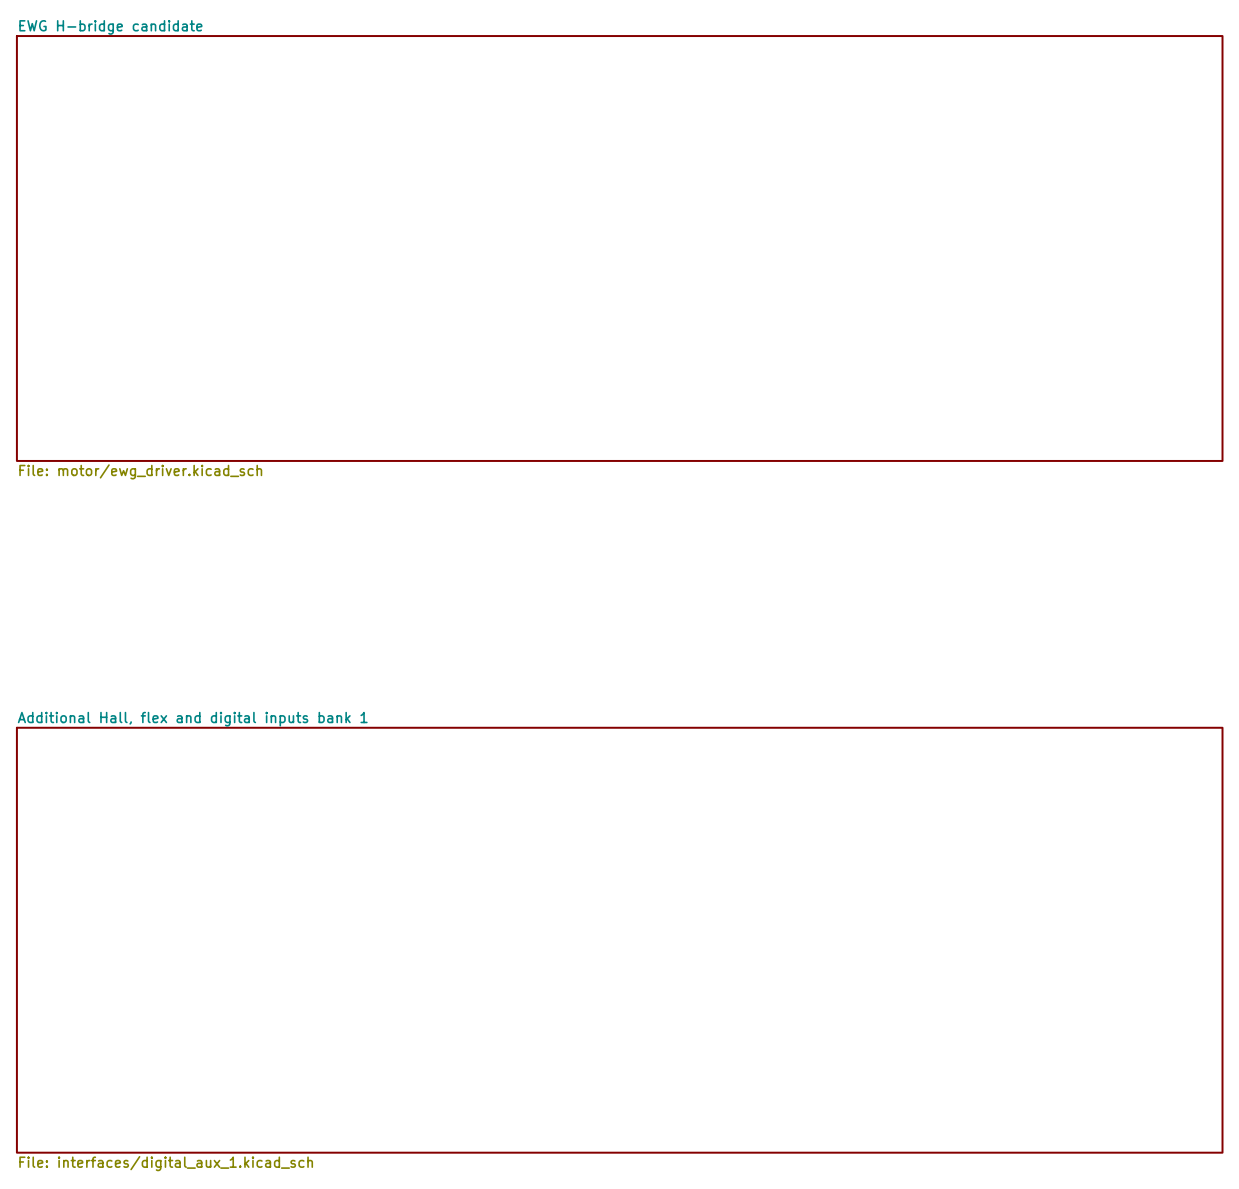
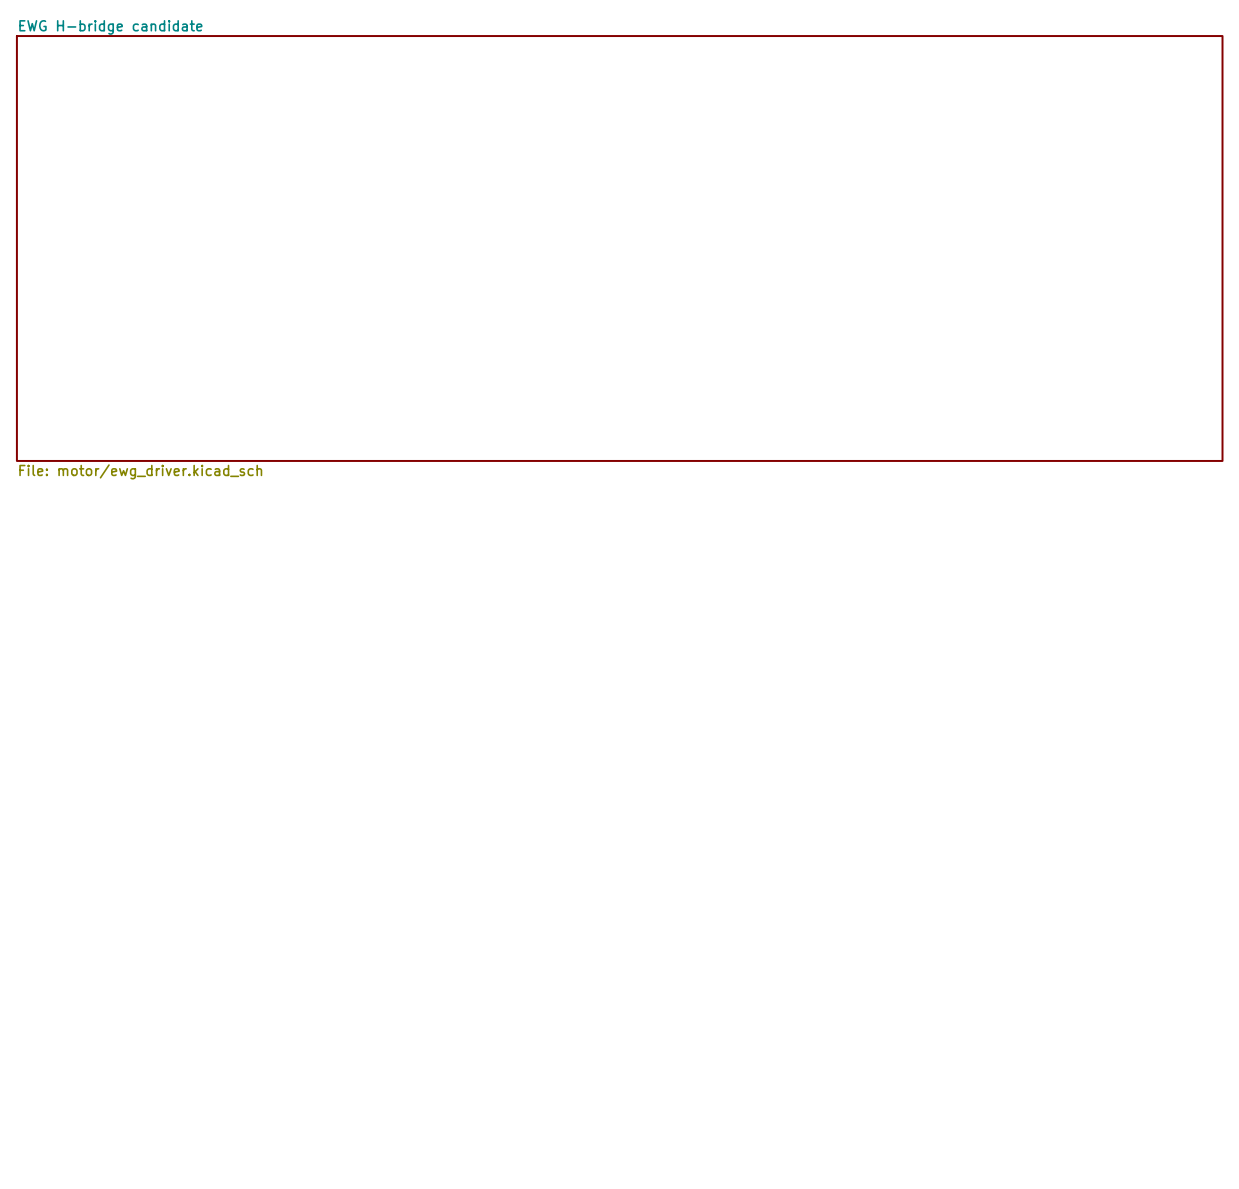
sheet Additional Hall, flex and digital inputs bank 1: File: interfaces/digital_aux_1.kicad_sch (619, 940) -> none

